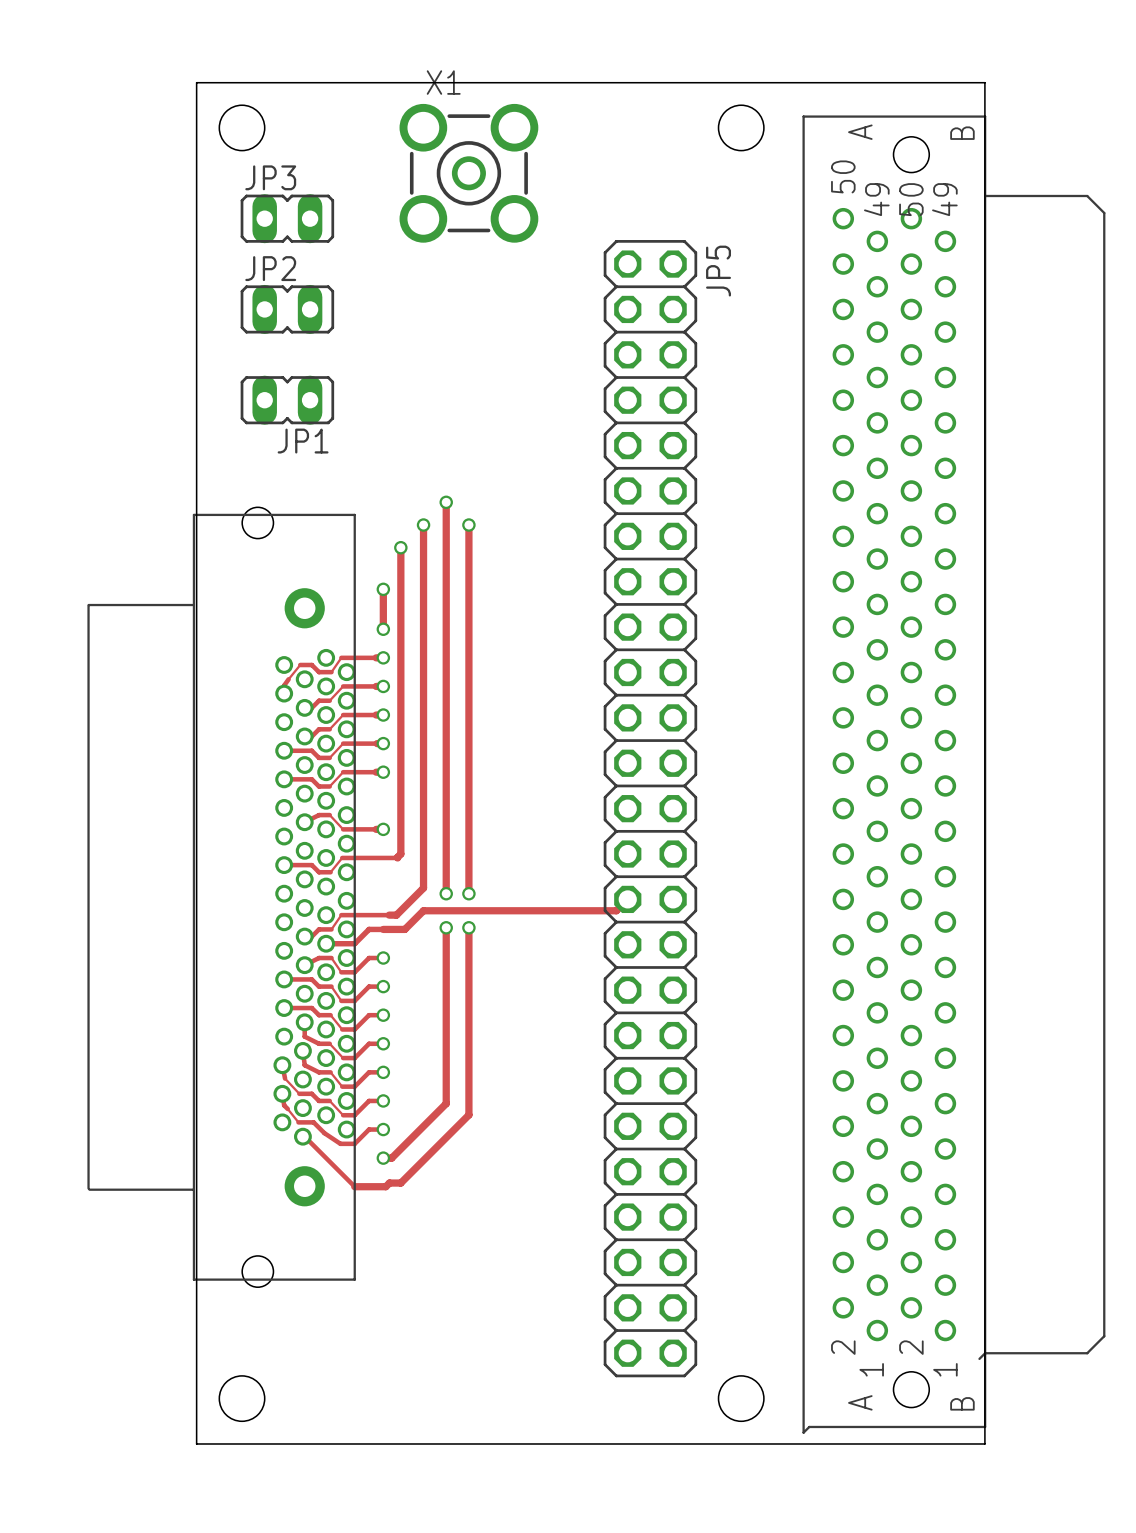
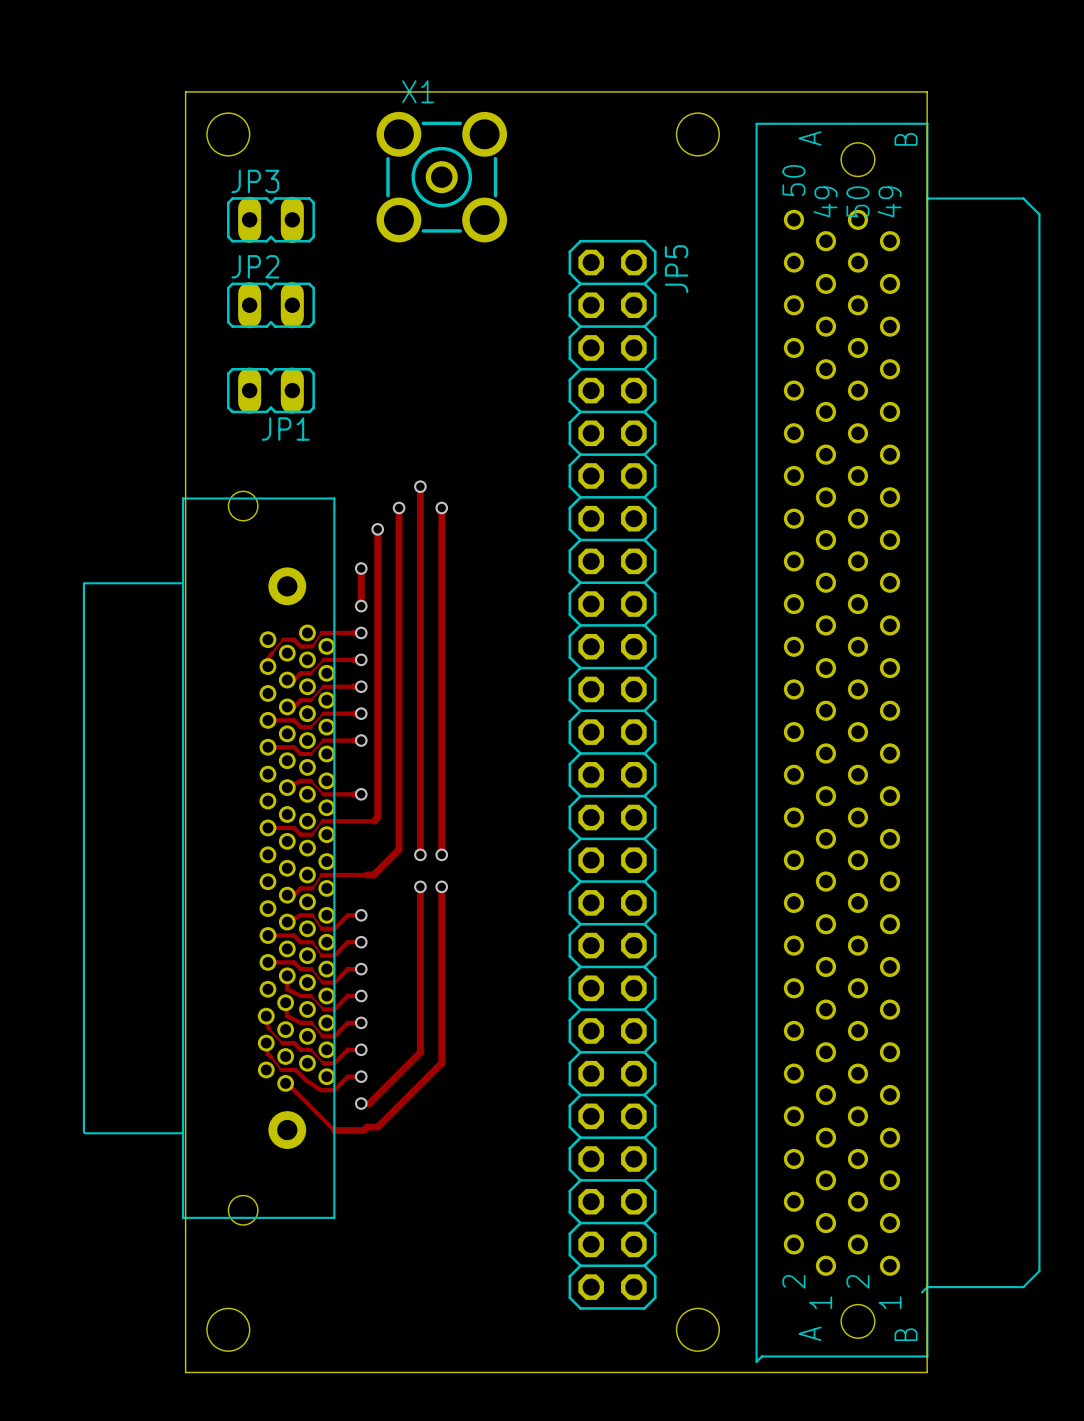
track: (627, 899) (616, 910) (423, 910) (404, 929) (369, 929) (354, 943) (326, 943) -> none

